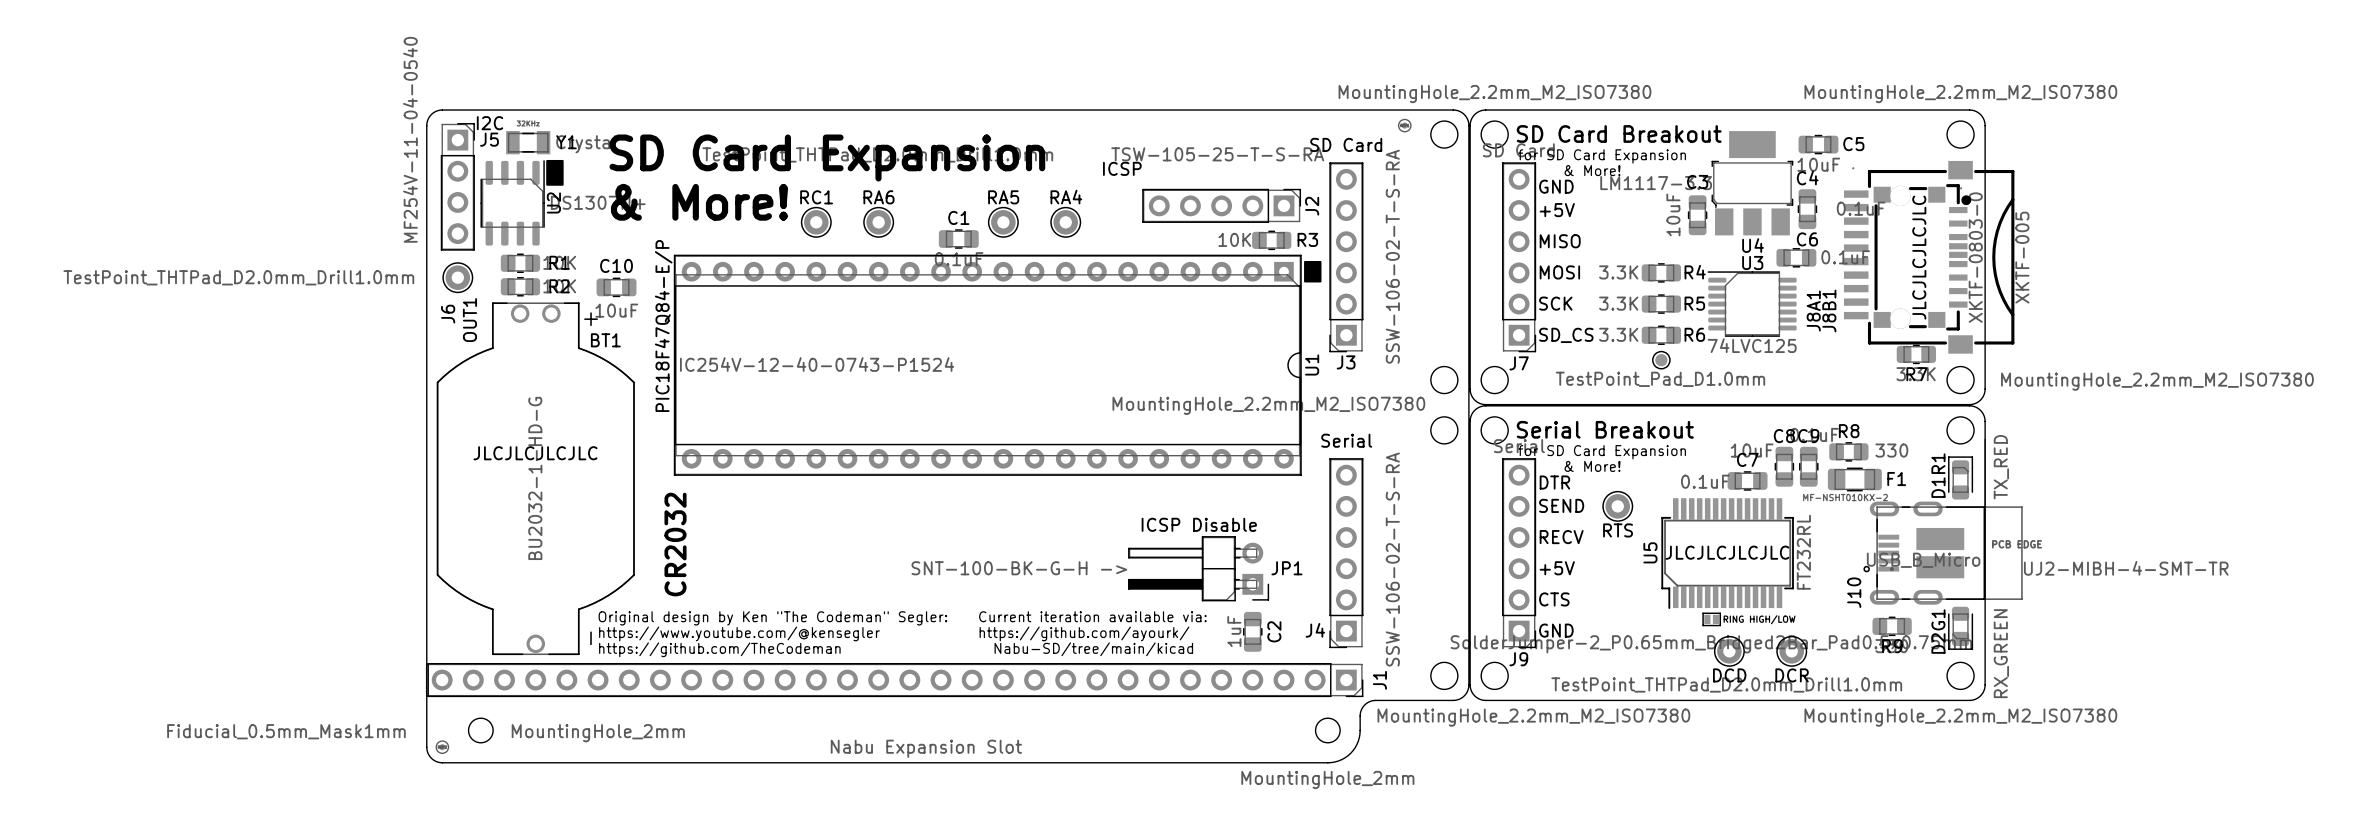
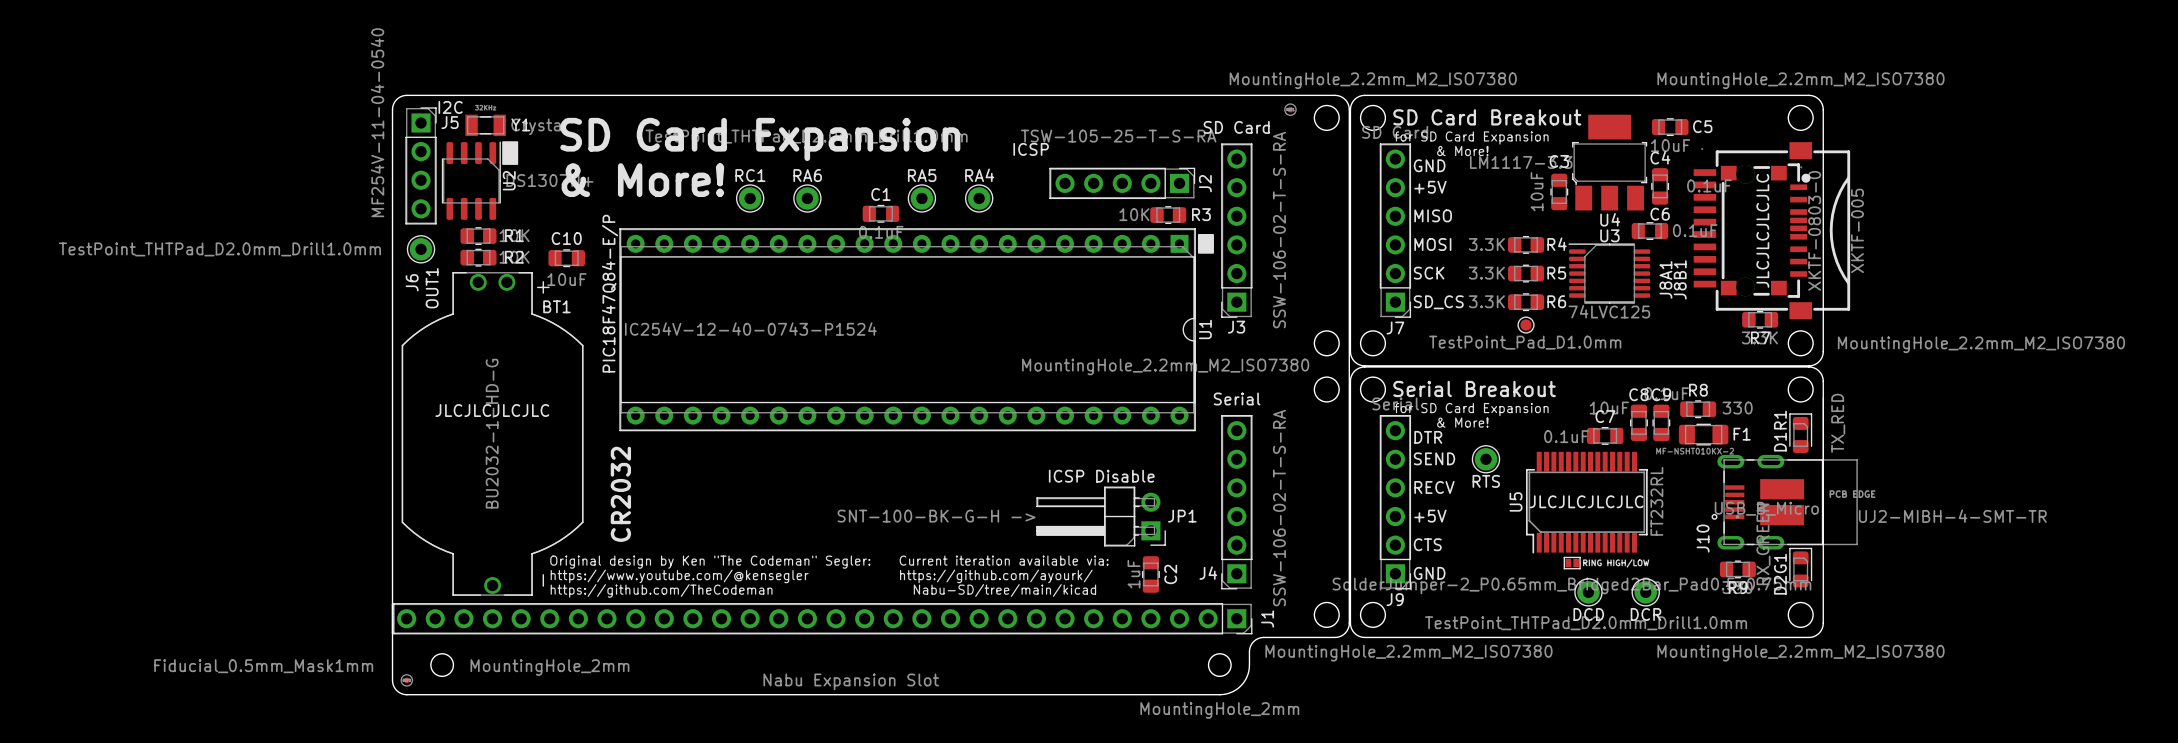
D2G1 rotation: 0° (1960, 628) -> 180° (1800, 567)

